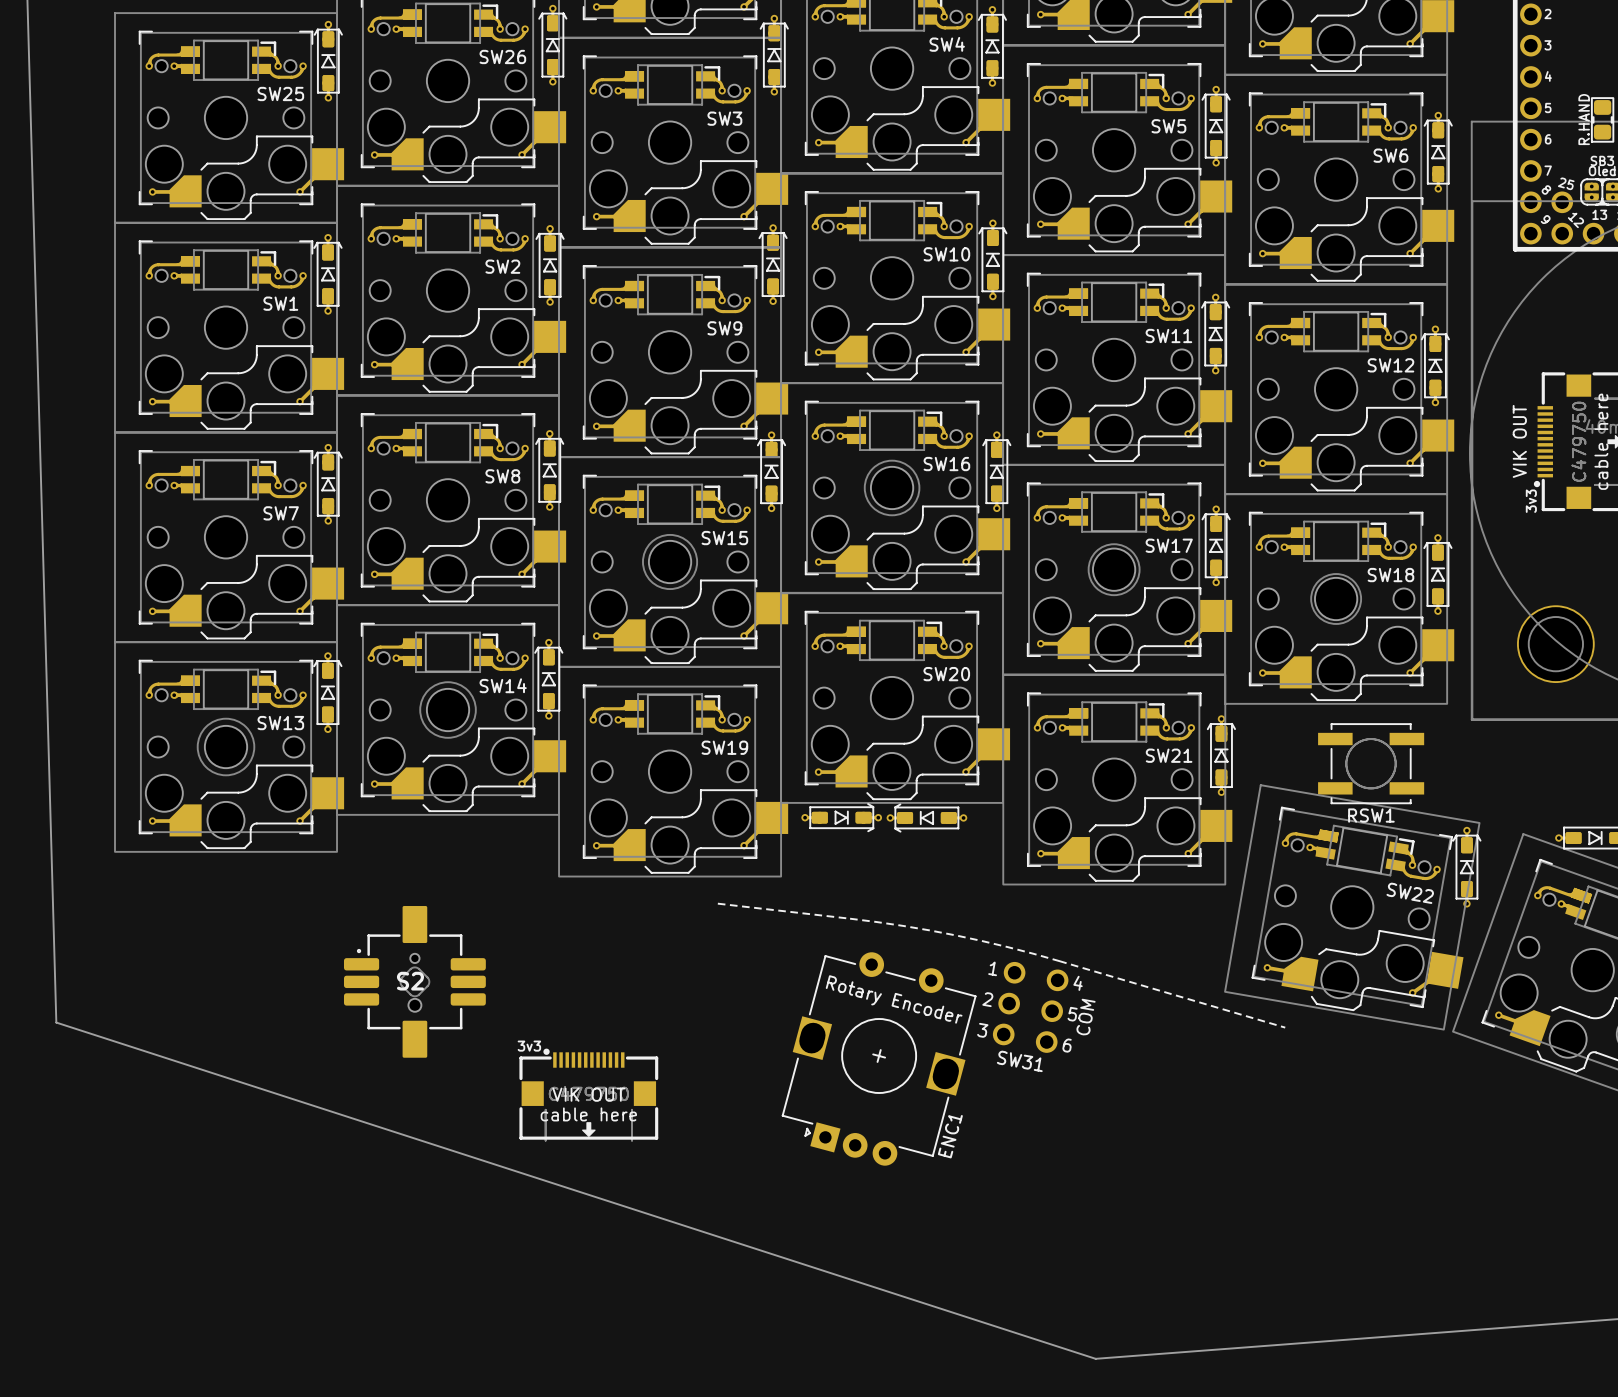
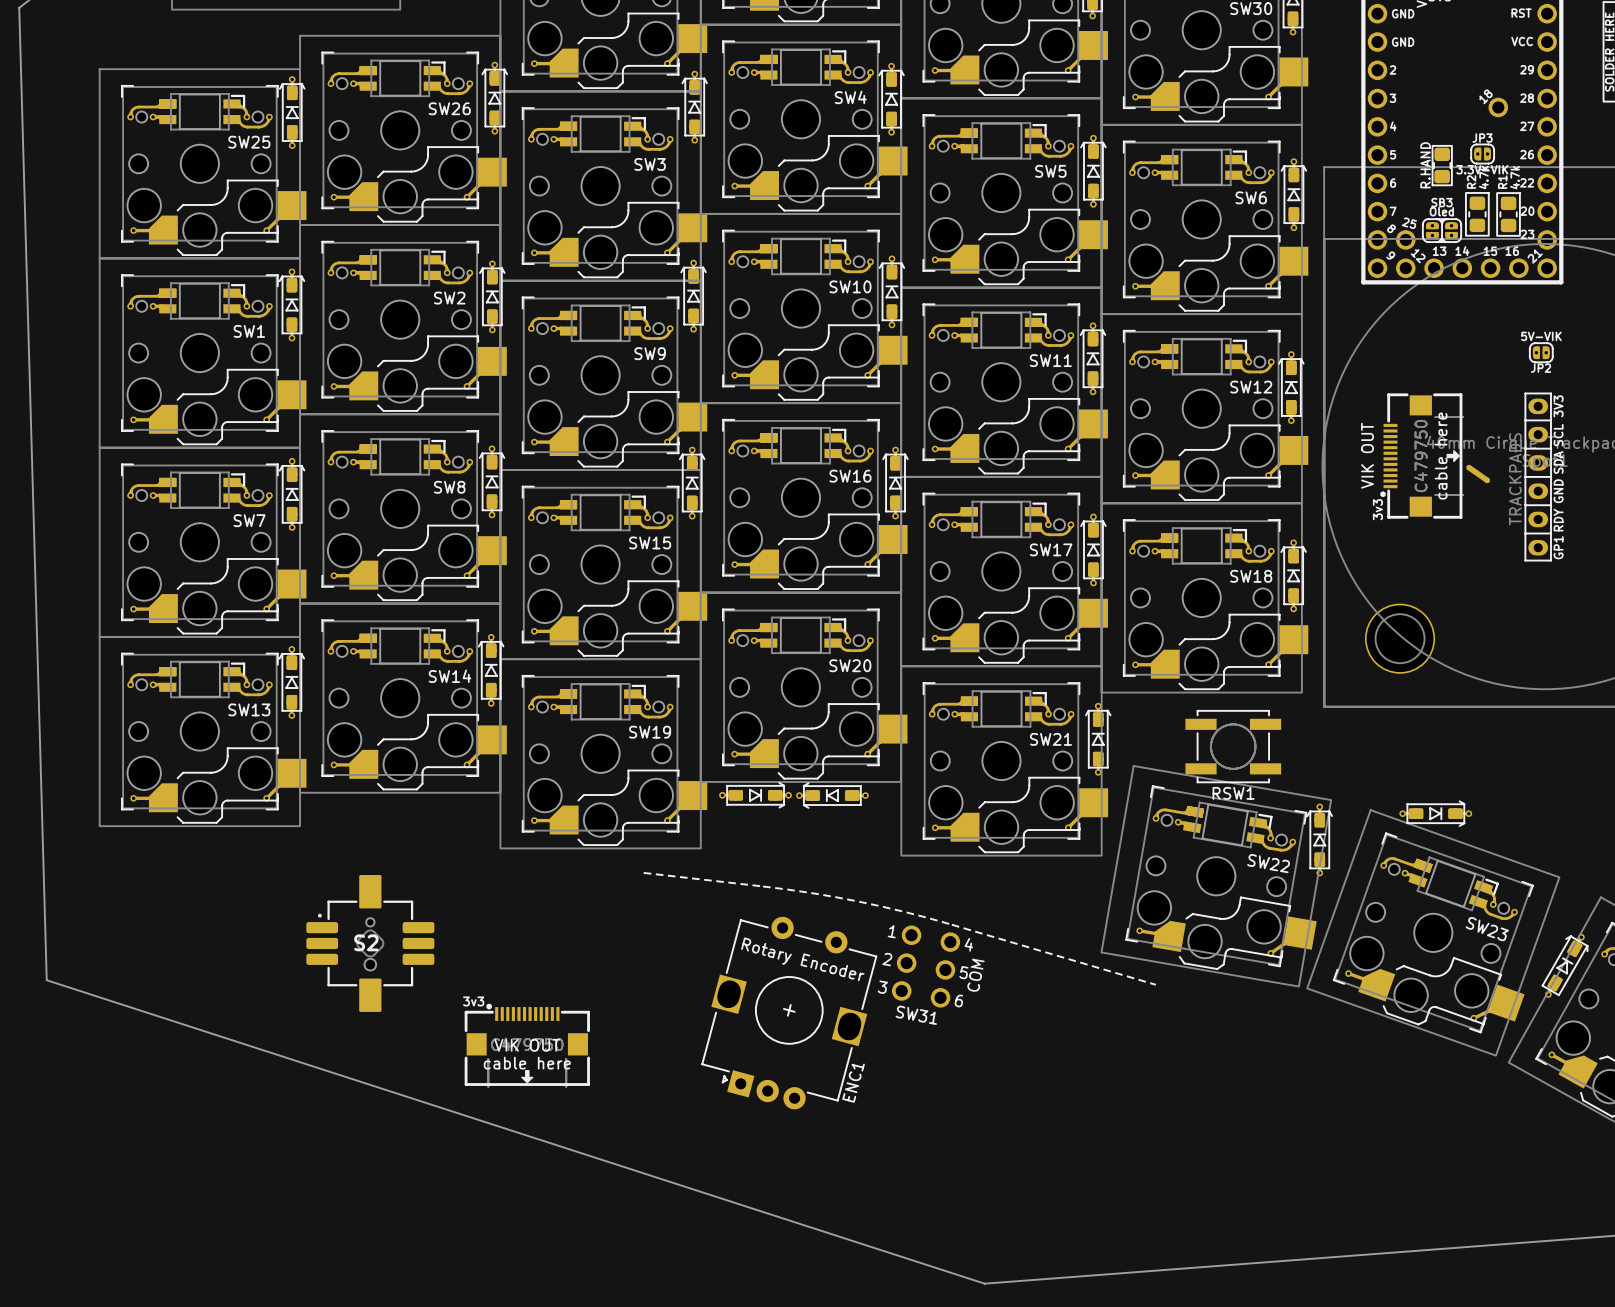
drawing: [864, 460, 921, 516] -> none
drawing: [642, 534, 698, 590] -> none
drawing: [1088, 543, 1141, 596] -> none
drawing: [1310, 573, 1362, 625] -> none
drawing: [419, 681, 477, 739] -> none
drawing: [197, 718, 255, 776] -> none

